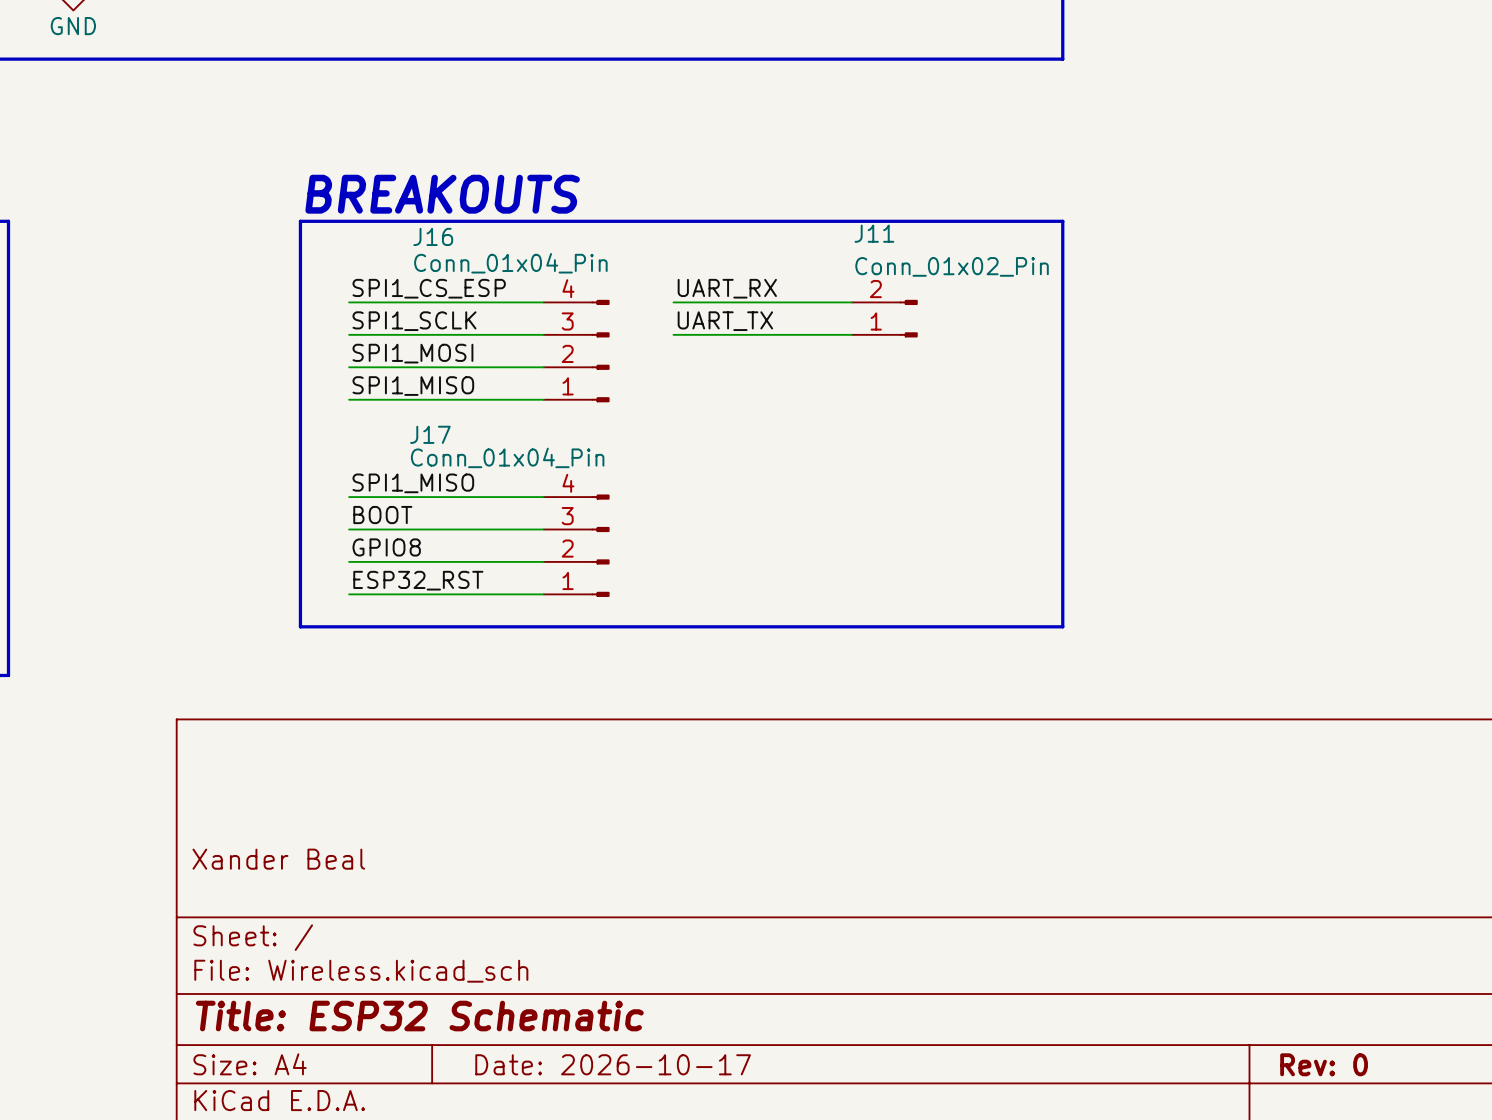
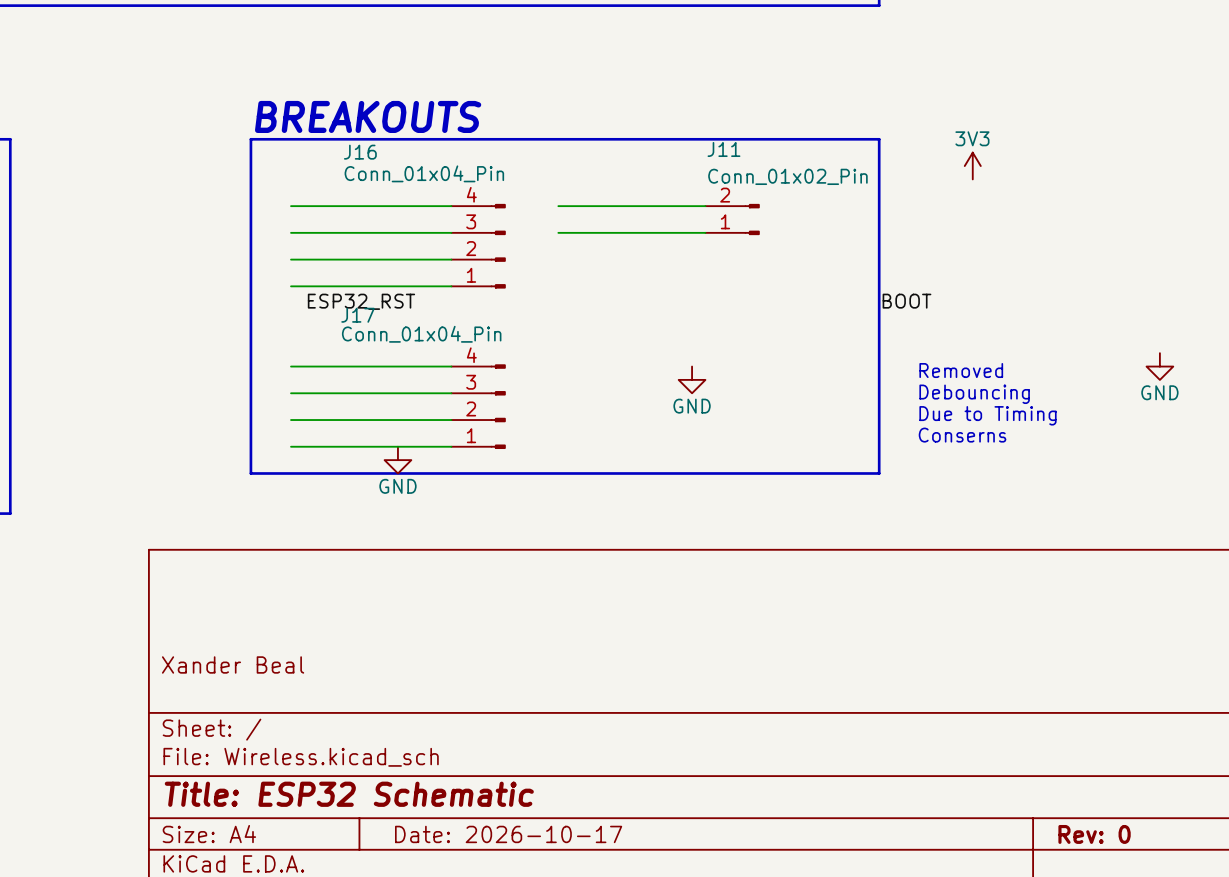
power symbol: none -> 3V3 (972, 166)
label: SPI1_CS_ESP (429, 288) -> none
label: UART_RX (727, 288) -> none
label: SPI1_SCLK (414, 321) -> none
label: UART_TX (725, 321) -> none
label: SPI1_MOSI (412, 353) -> none
label: SPI1_MISO (413, 386) -> none
label: none -> BOOT (906, 301)
label: SPI1_MISO (413, 483) -> none
power symbol: none -> GND (1159, 366)
text: none -> Removed (961, 370)
power symbol: none -> GND (692, 379)
label: BOOT (382, 515) -> none
text: none -> Debouncing (974, 394)
label: GPIO8 (386, 547) -> none
text: none -> Due to Timing (987, 415)
label position: ESP32_RST (418, 580) -> ESP32_RST (361, 301)
text: none -> Conserns (962, 435)
power symbol: none -> GND (397, 460)

